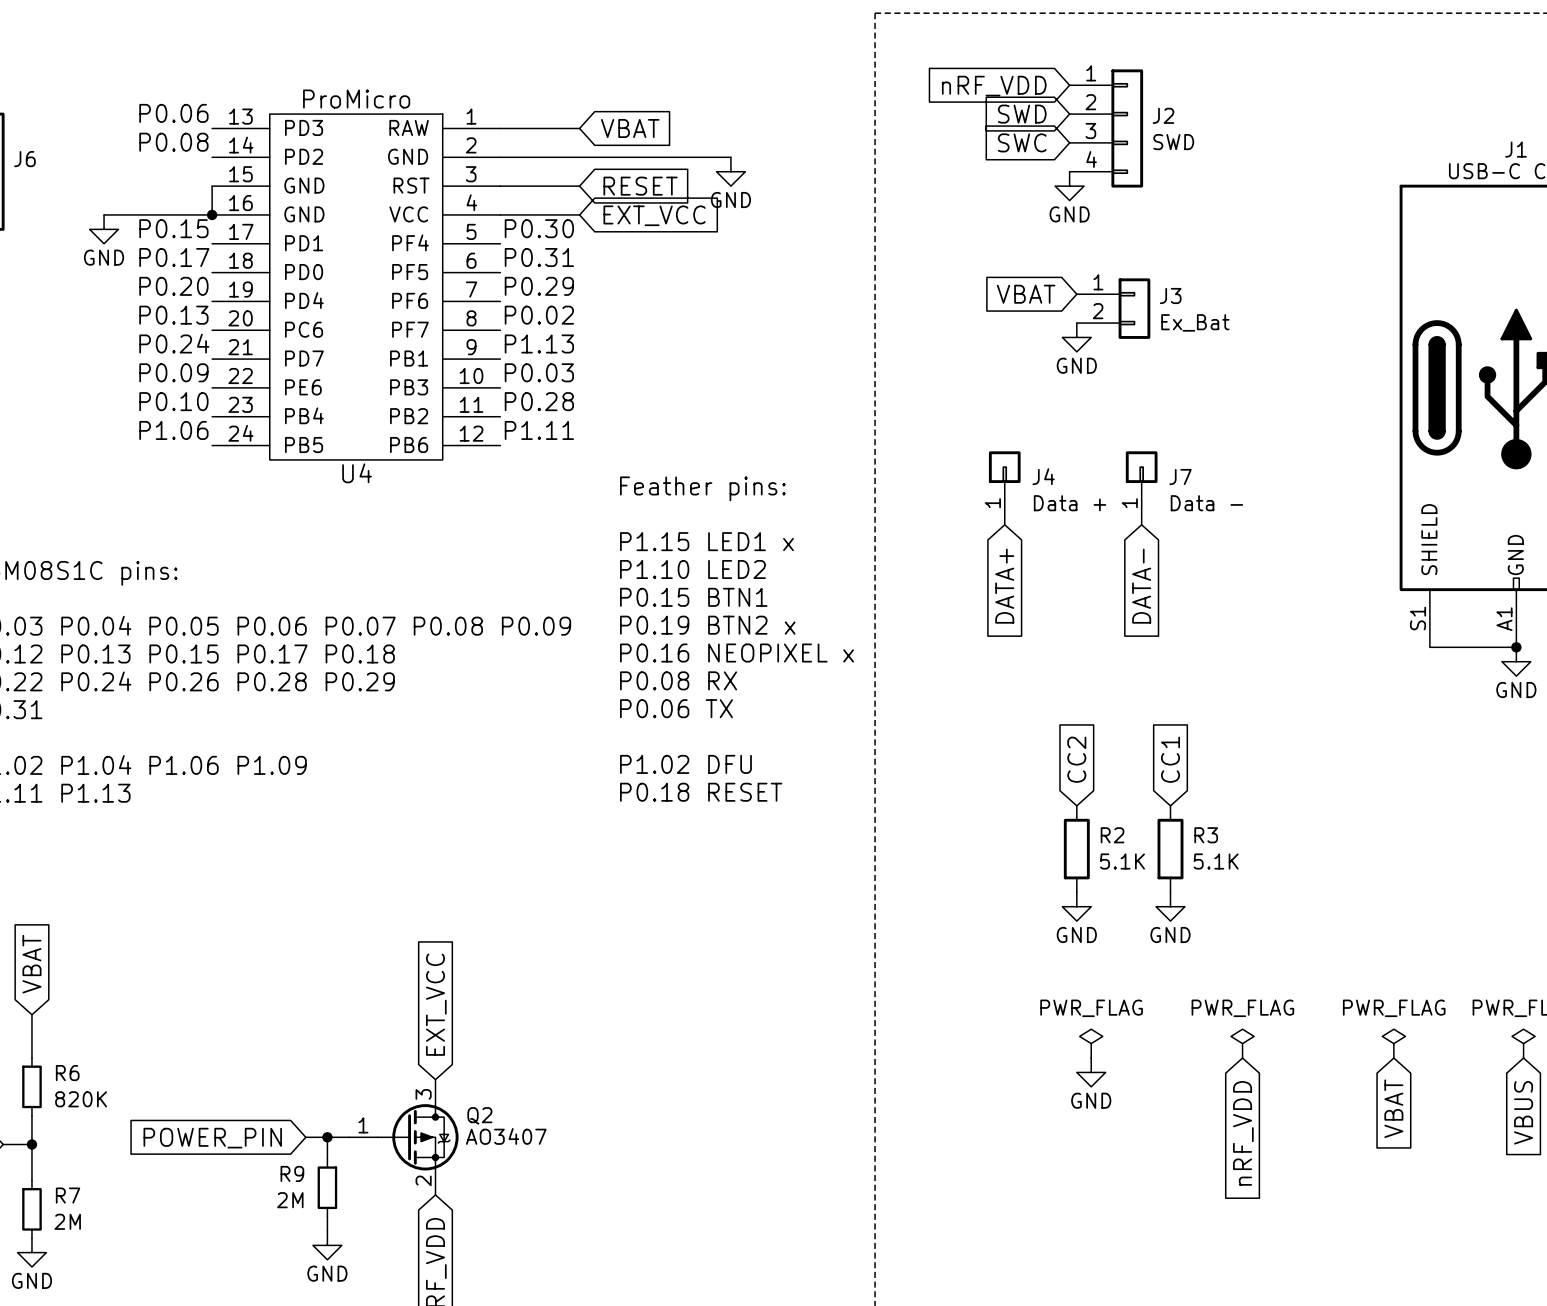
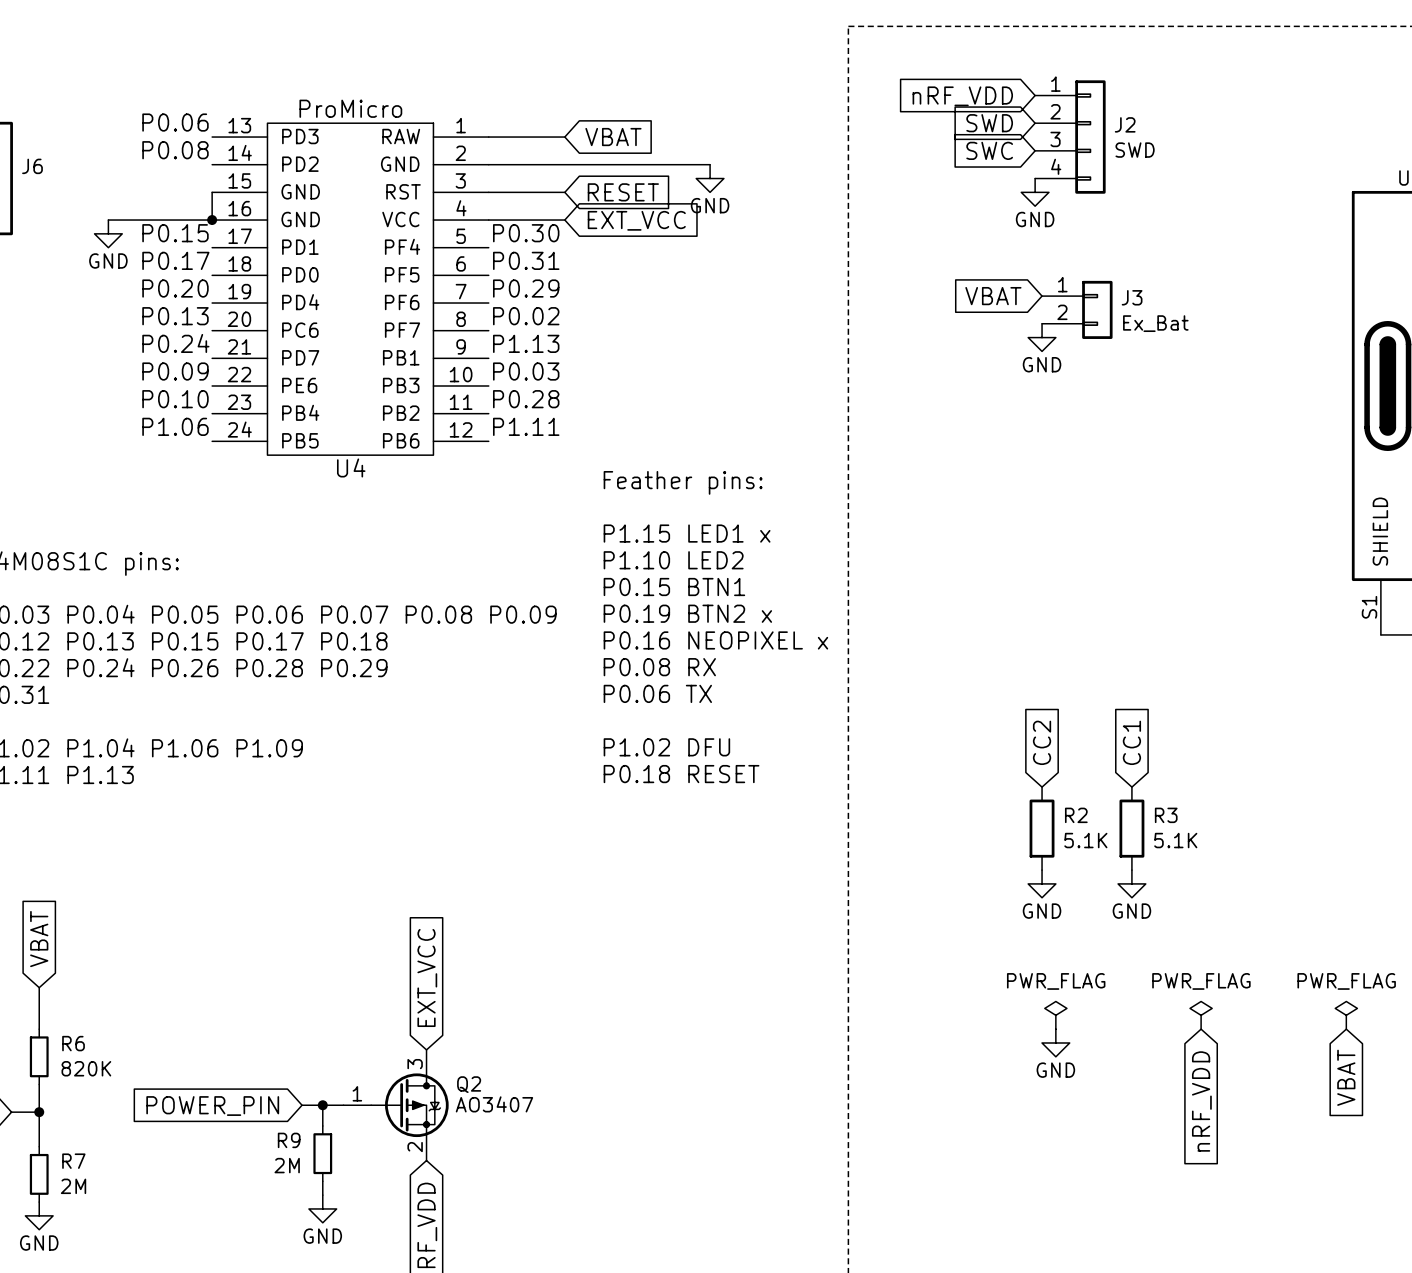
J4: Data + (1004, 488) -> none
J7: Data - (1141, 488) -> none
global label: DATA+ (1004, 586) -> none
global label: DATA- (1141, 586) -> none

